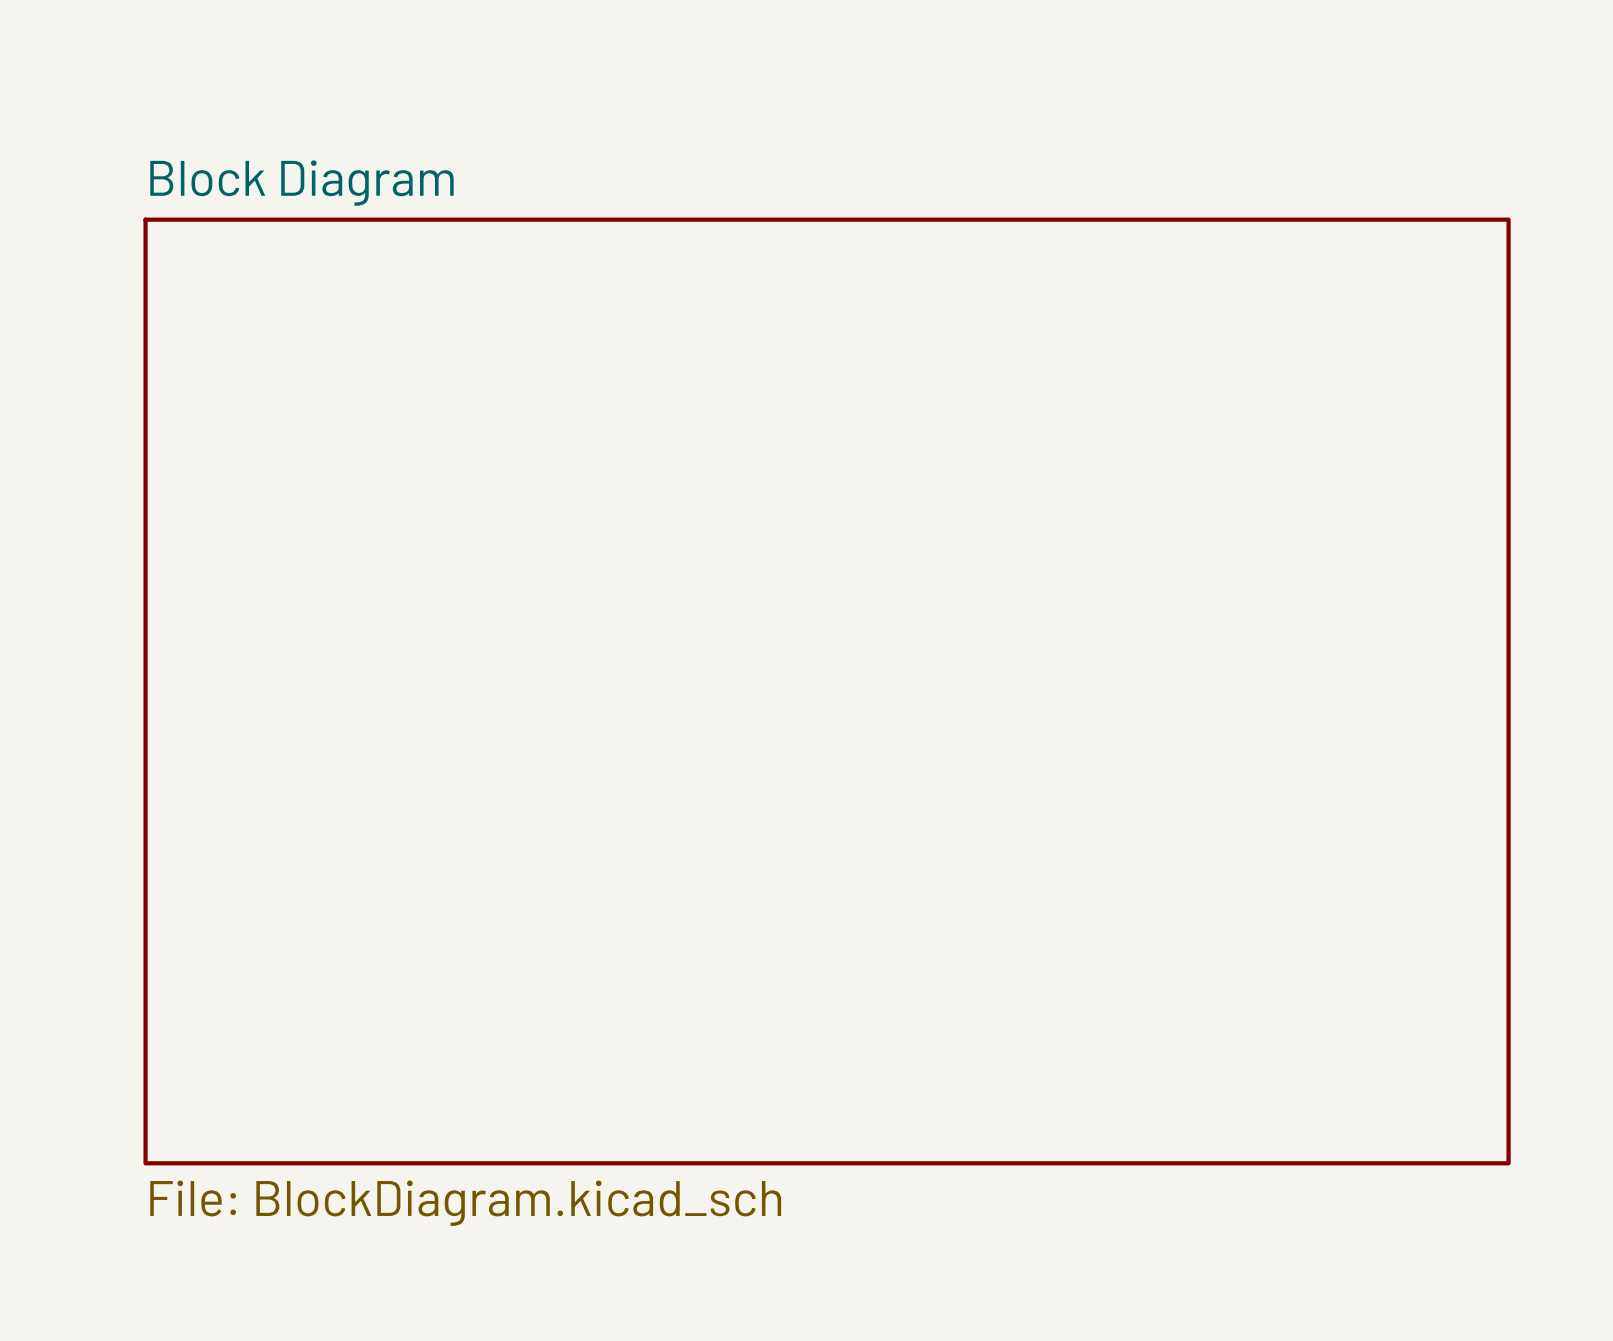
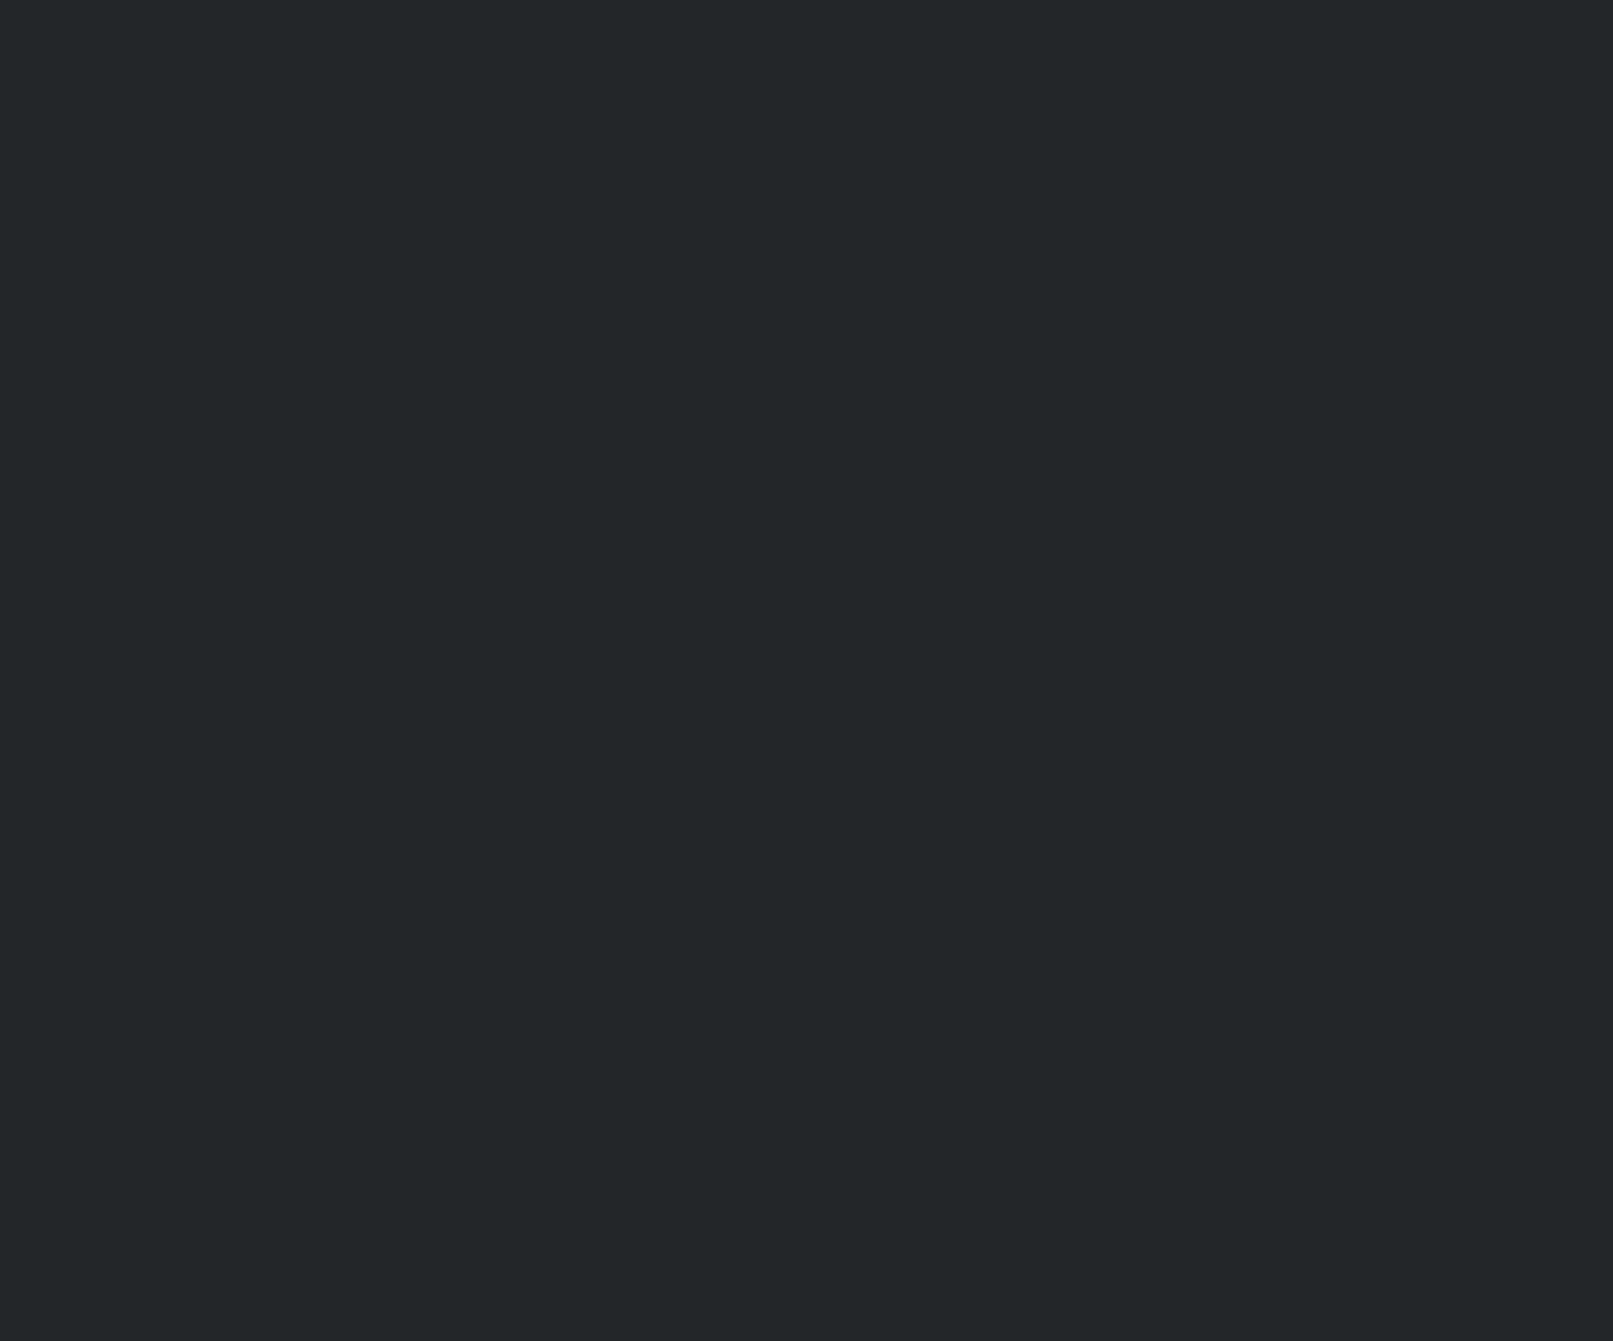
sheet Block Diagram: File: BlockDiagram.kicad_sch (827, 691) -> none

